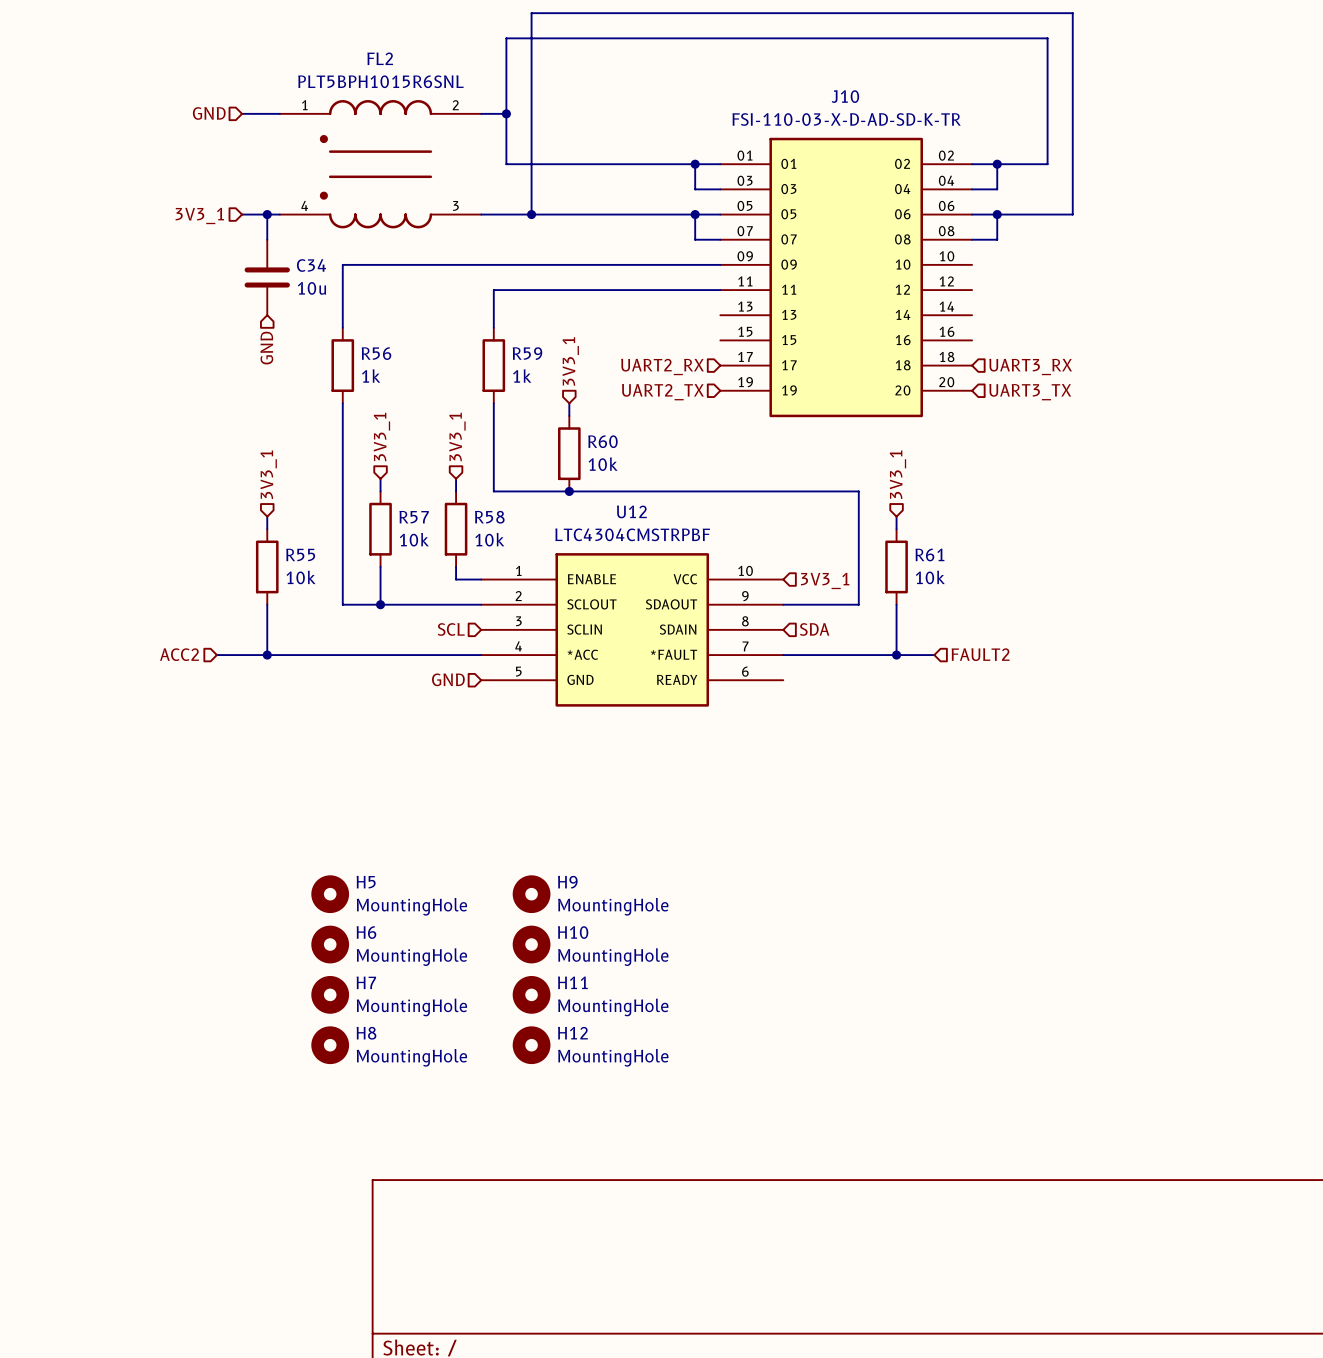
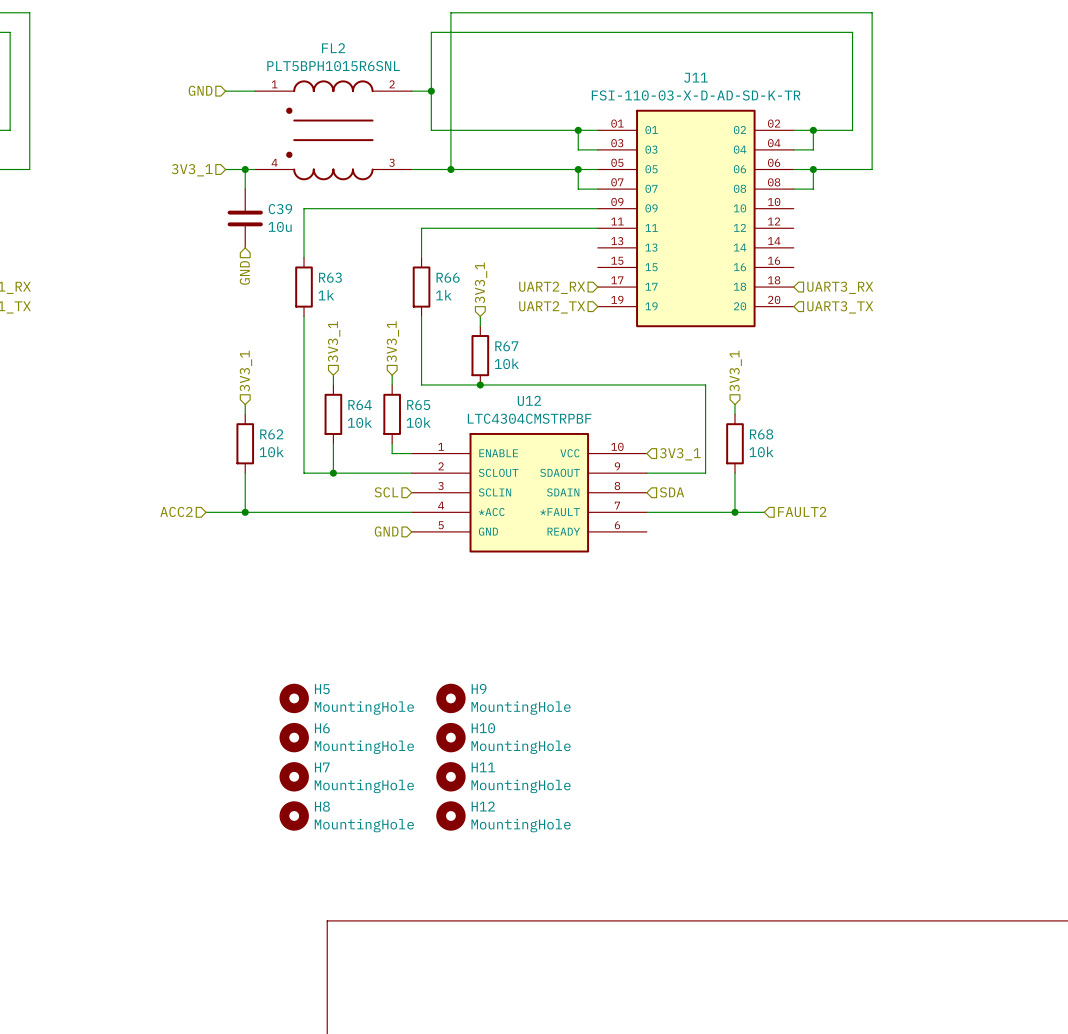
J10 name: J10 (845, 96) -> J11 (696, 77)
C34 name: C34 (311, 265) -> C39 (280, 209)
R56 name: R56 (376, 353) -> R63 (330, 277)
R59 name: R59 (527, 353) -> R66 (448, 277)
R60 name: R60 (602, 441) -> R67 (506, 346)
R57 name: R57 (414, 517) -> R64 (360, 405)
R58 name: R58 (489, 517) -> R65 (418, 405)
R55 name: R55 (300, 554) -> R62 (271, 434)
R61 name: R61 (929, 554) -> R68 (761, 434)

